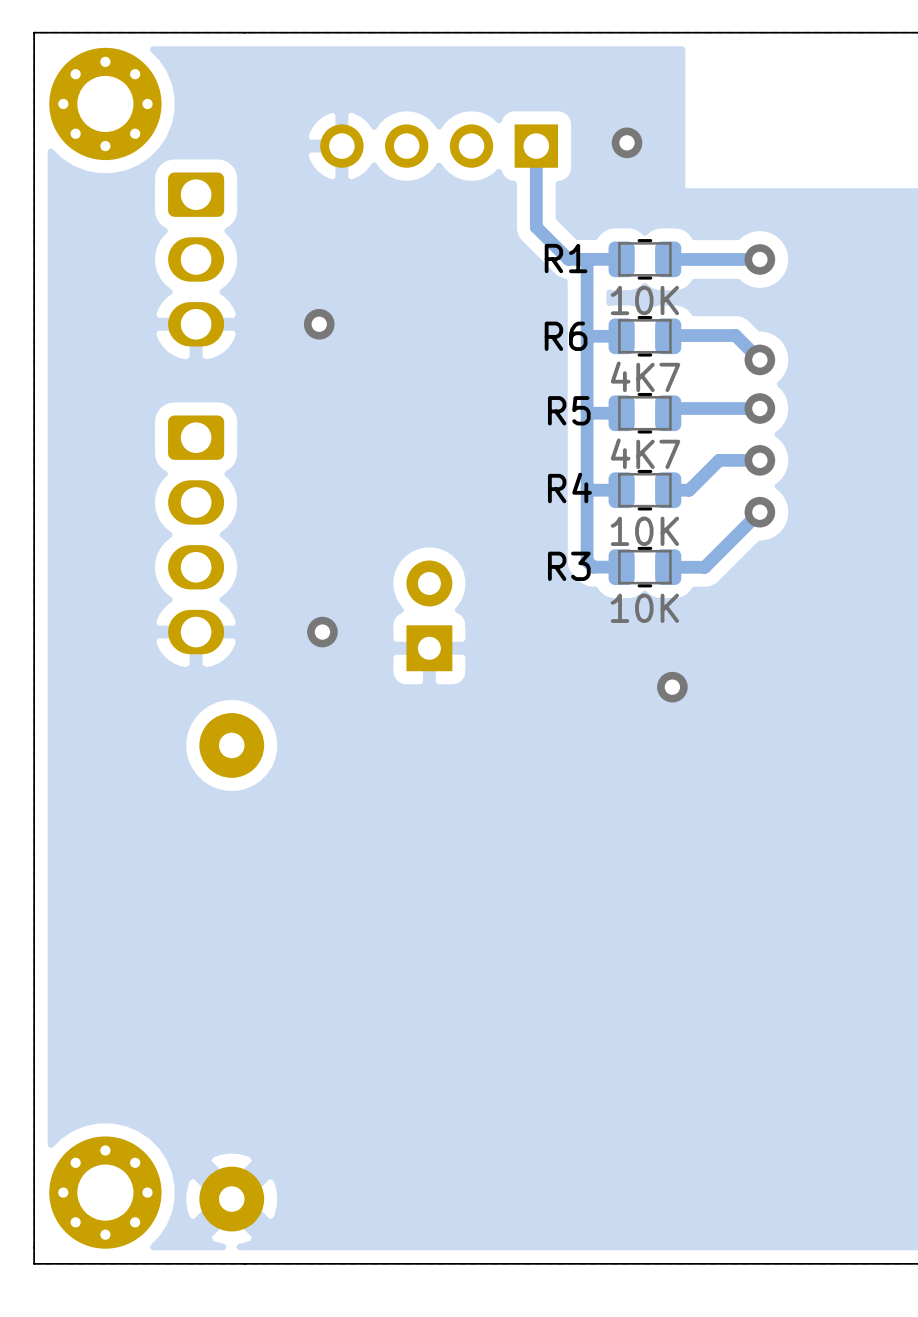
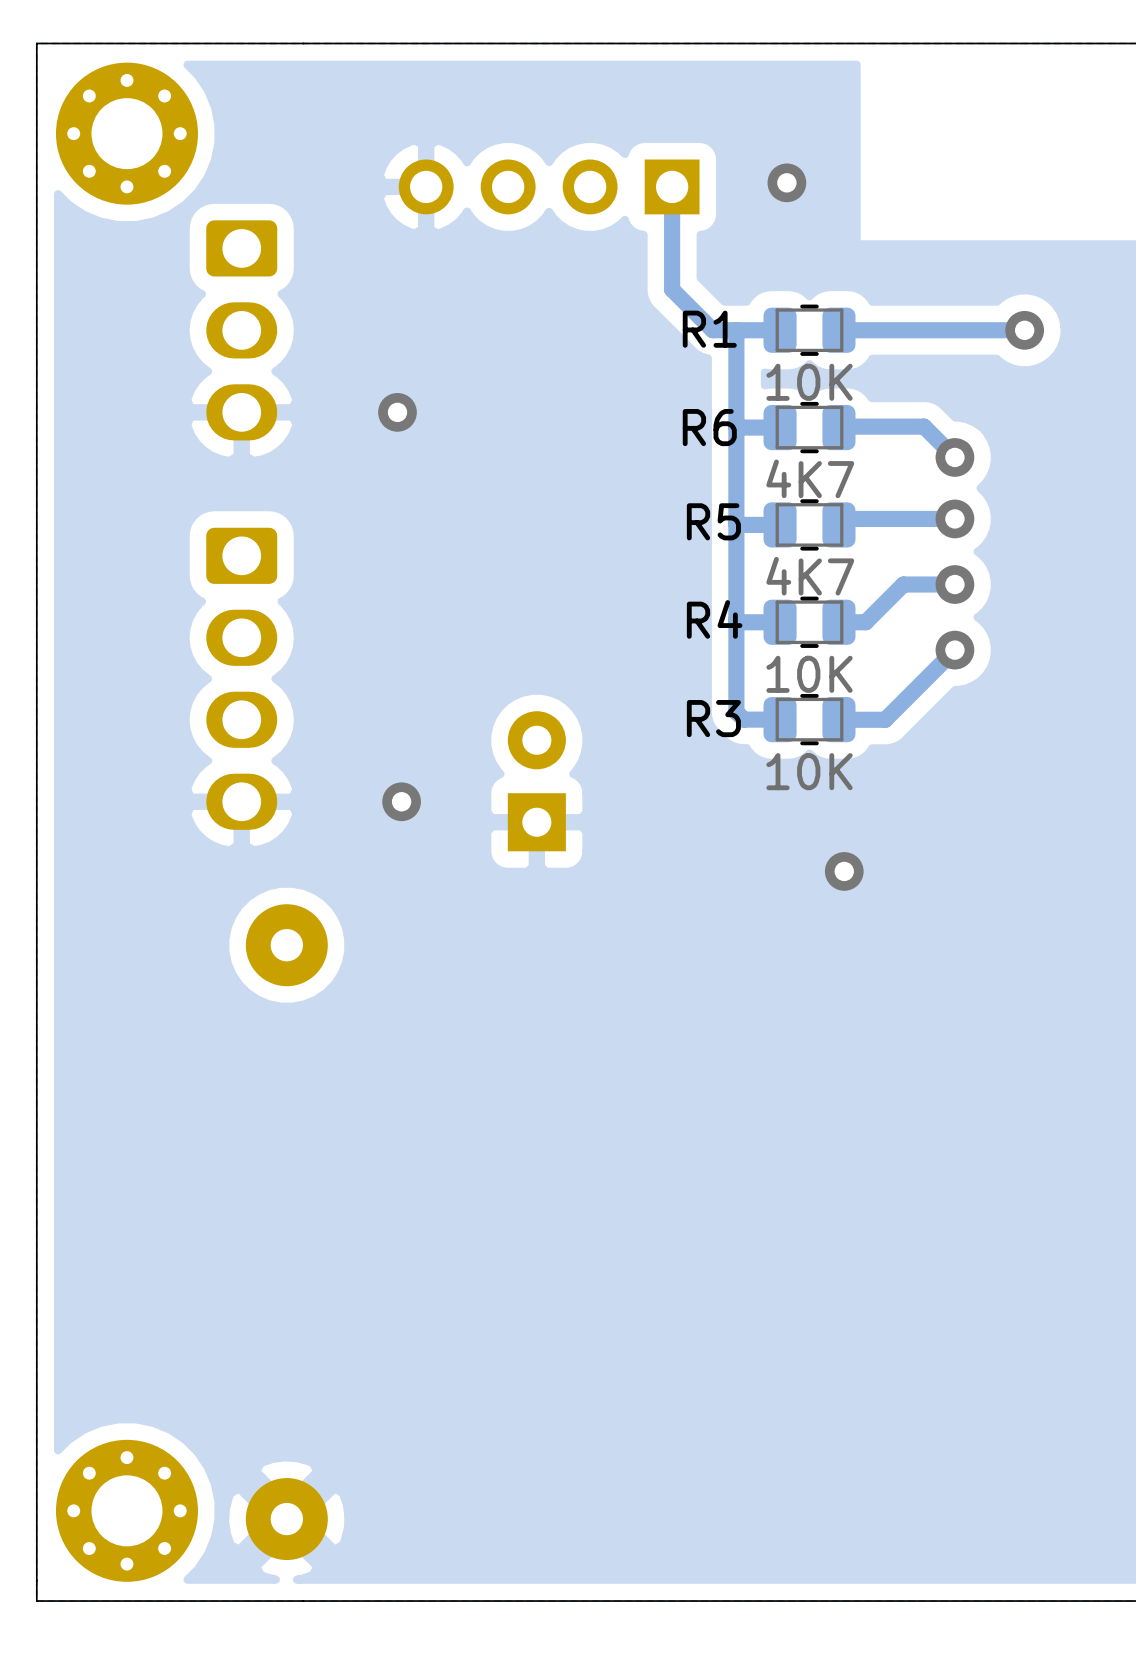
track: (759, 259) (668, 259) -> (1024, 330) (838, 330)
via position: (759, 259) -> (1024, 330)

